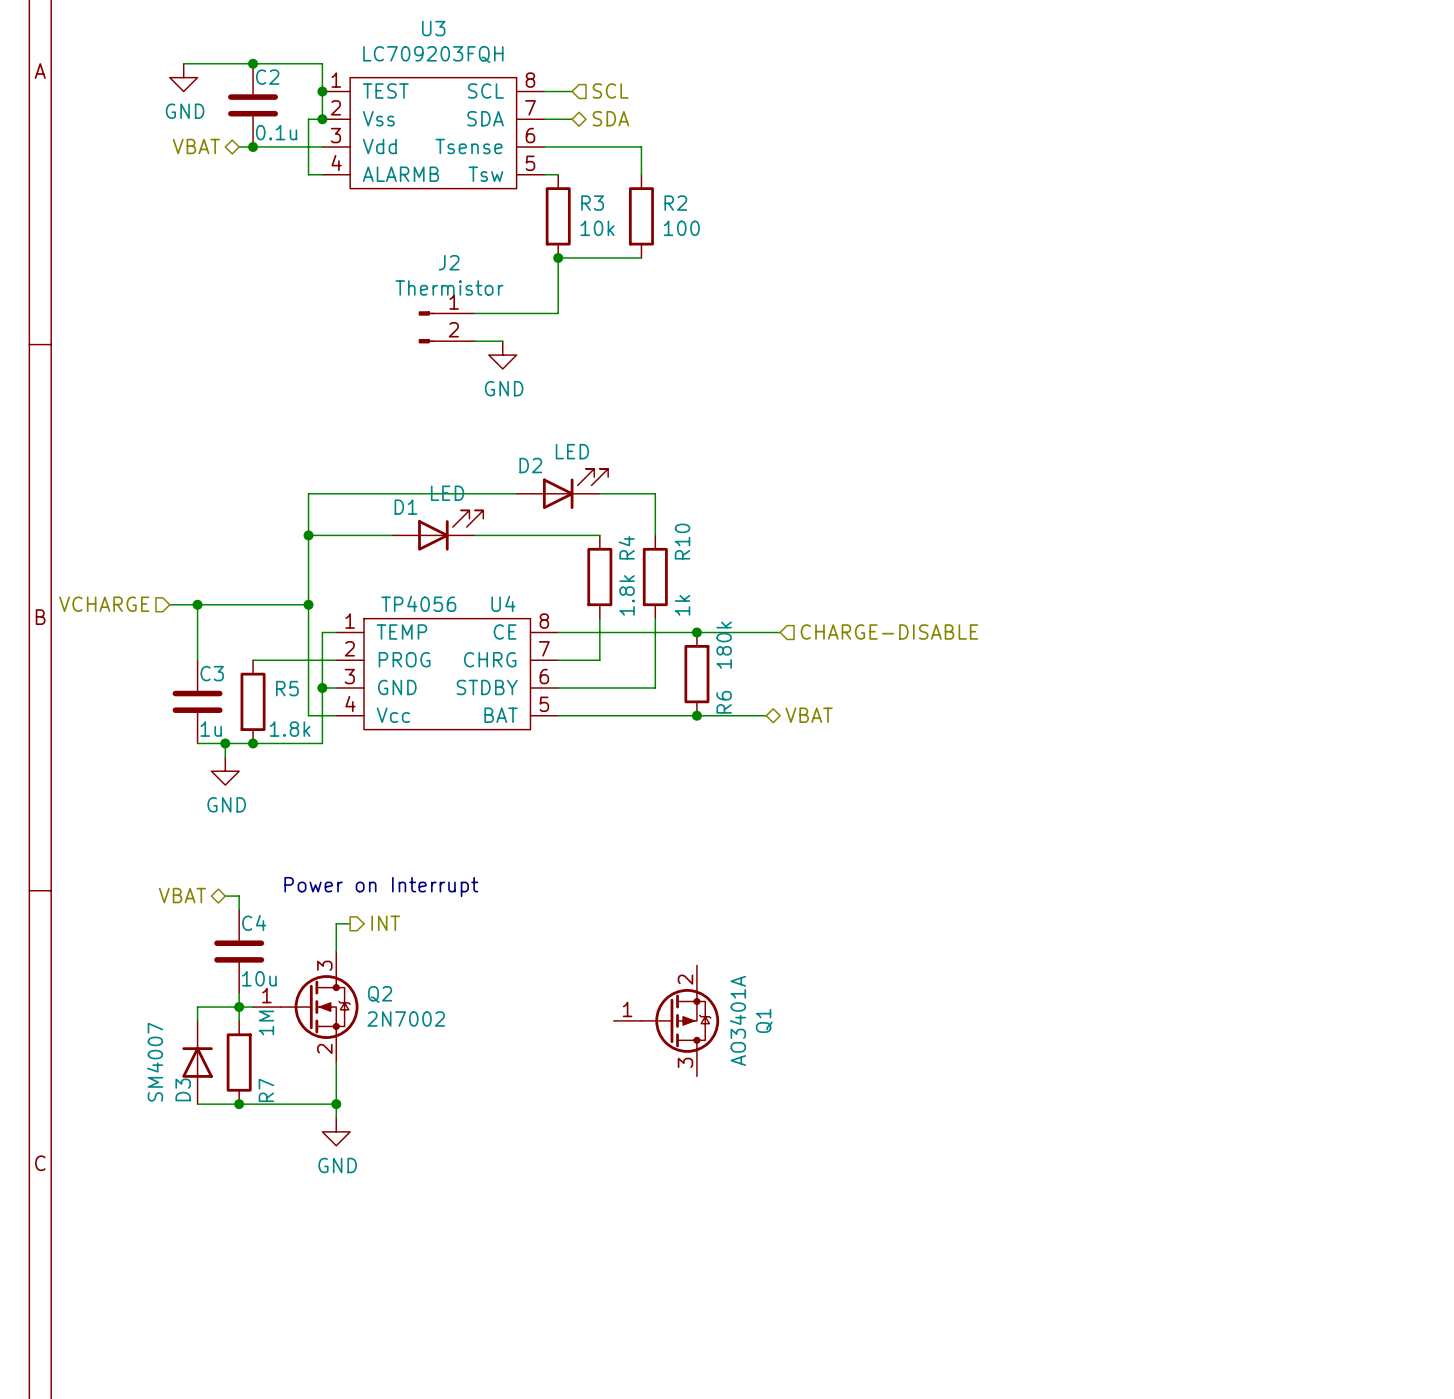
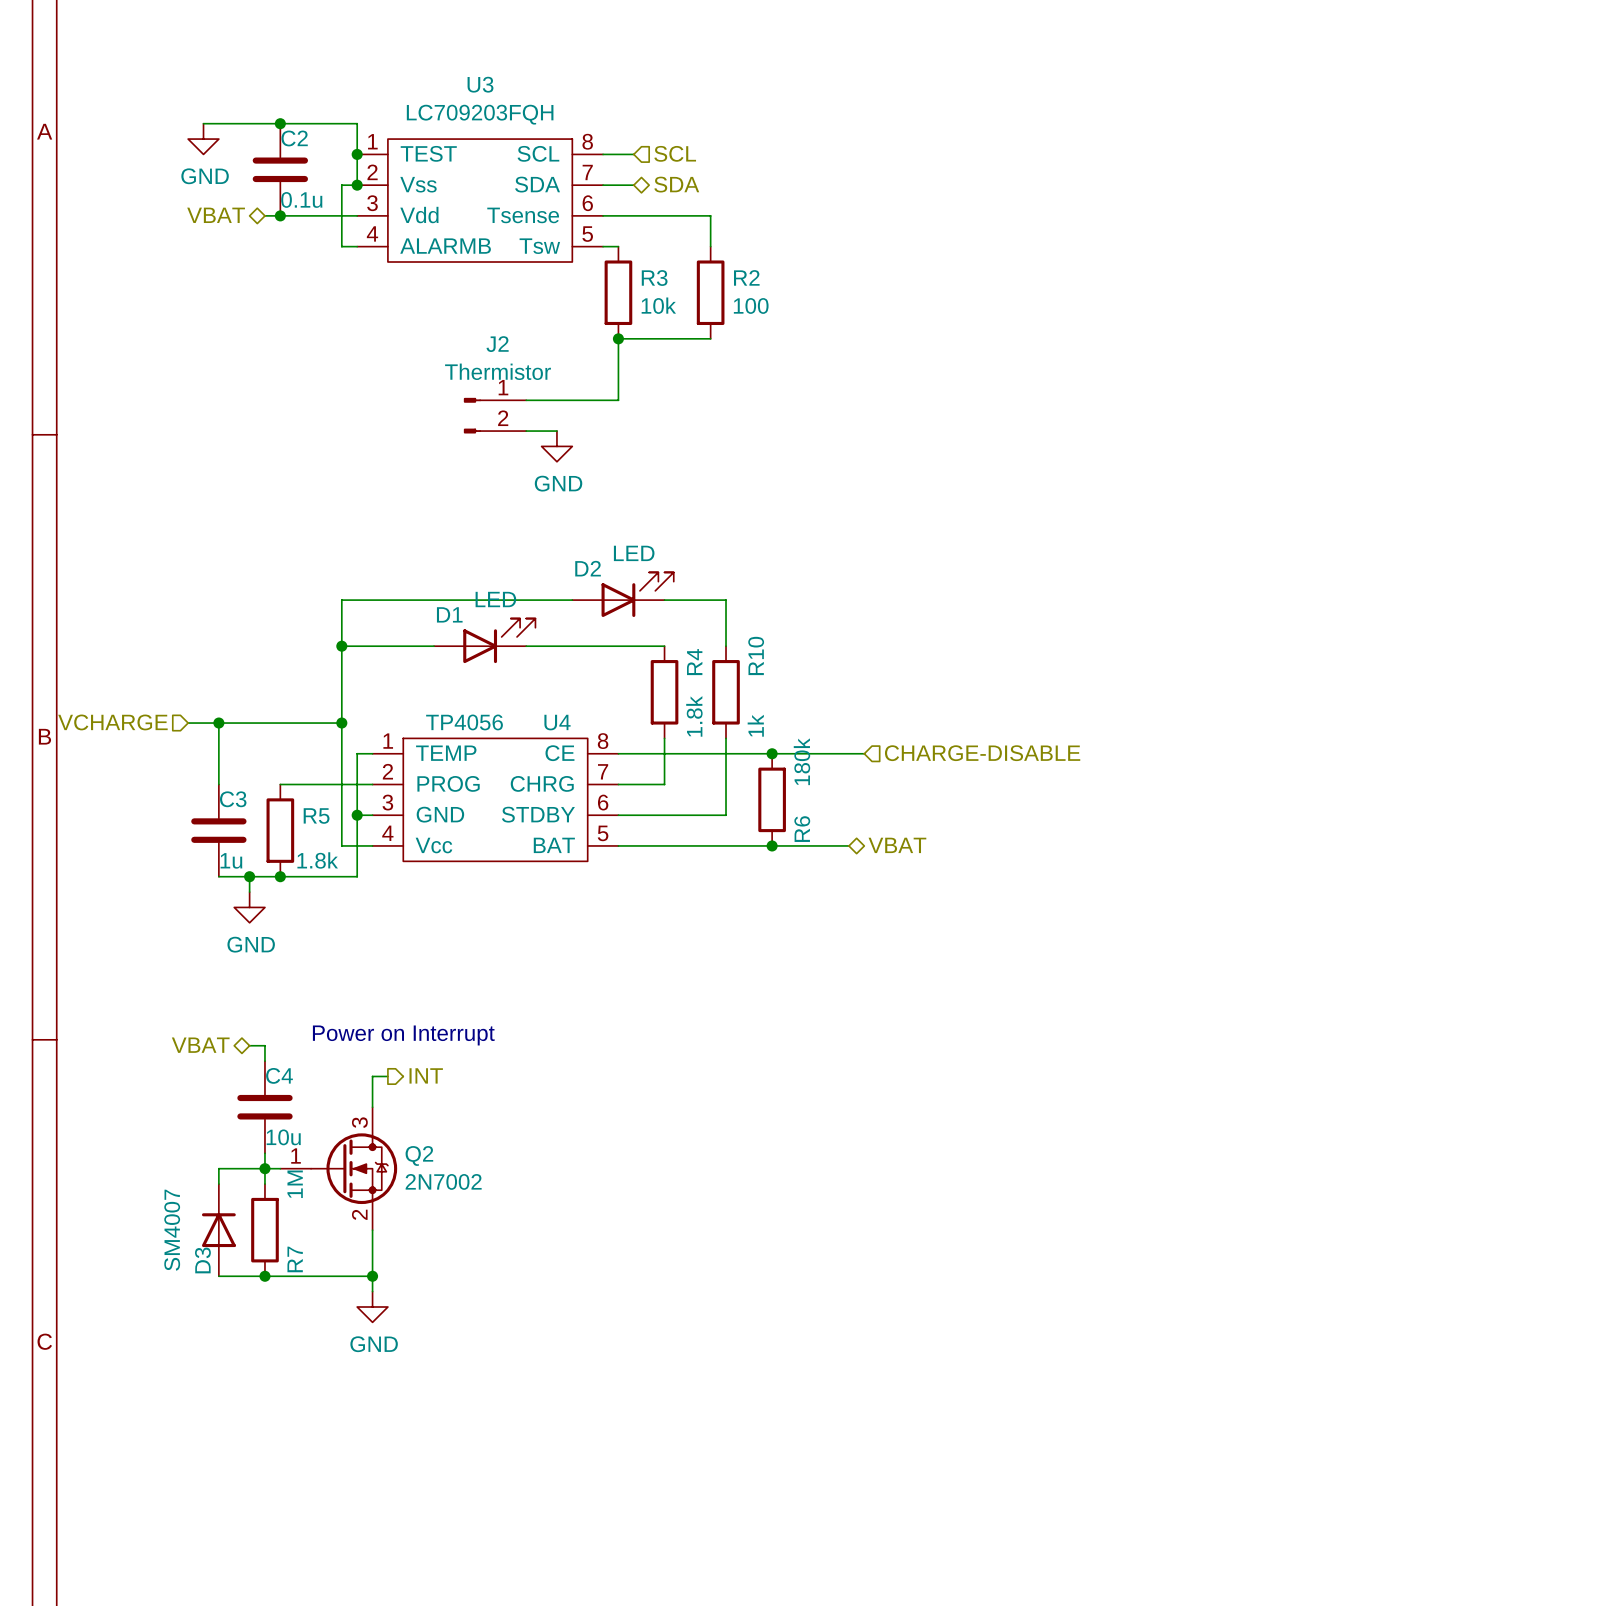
Q1: AO3401A (666, 1020) -> none

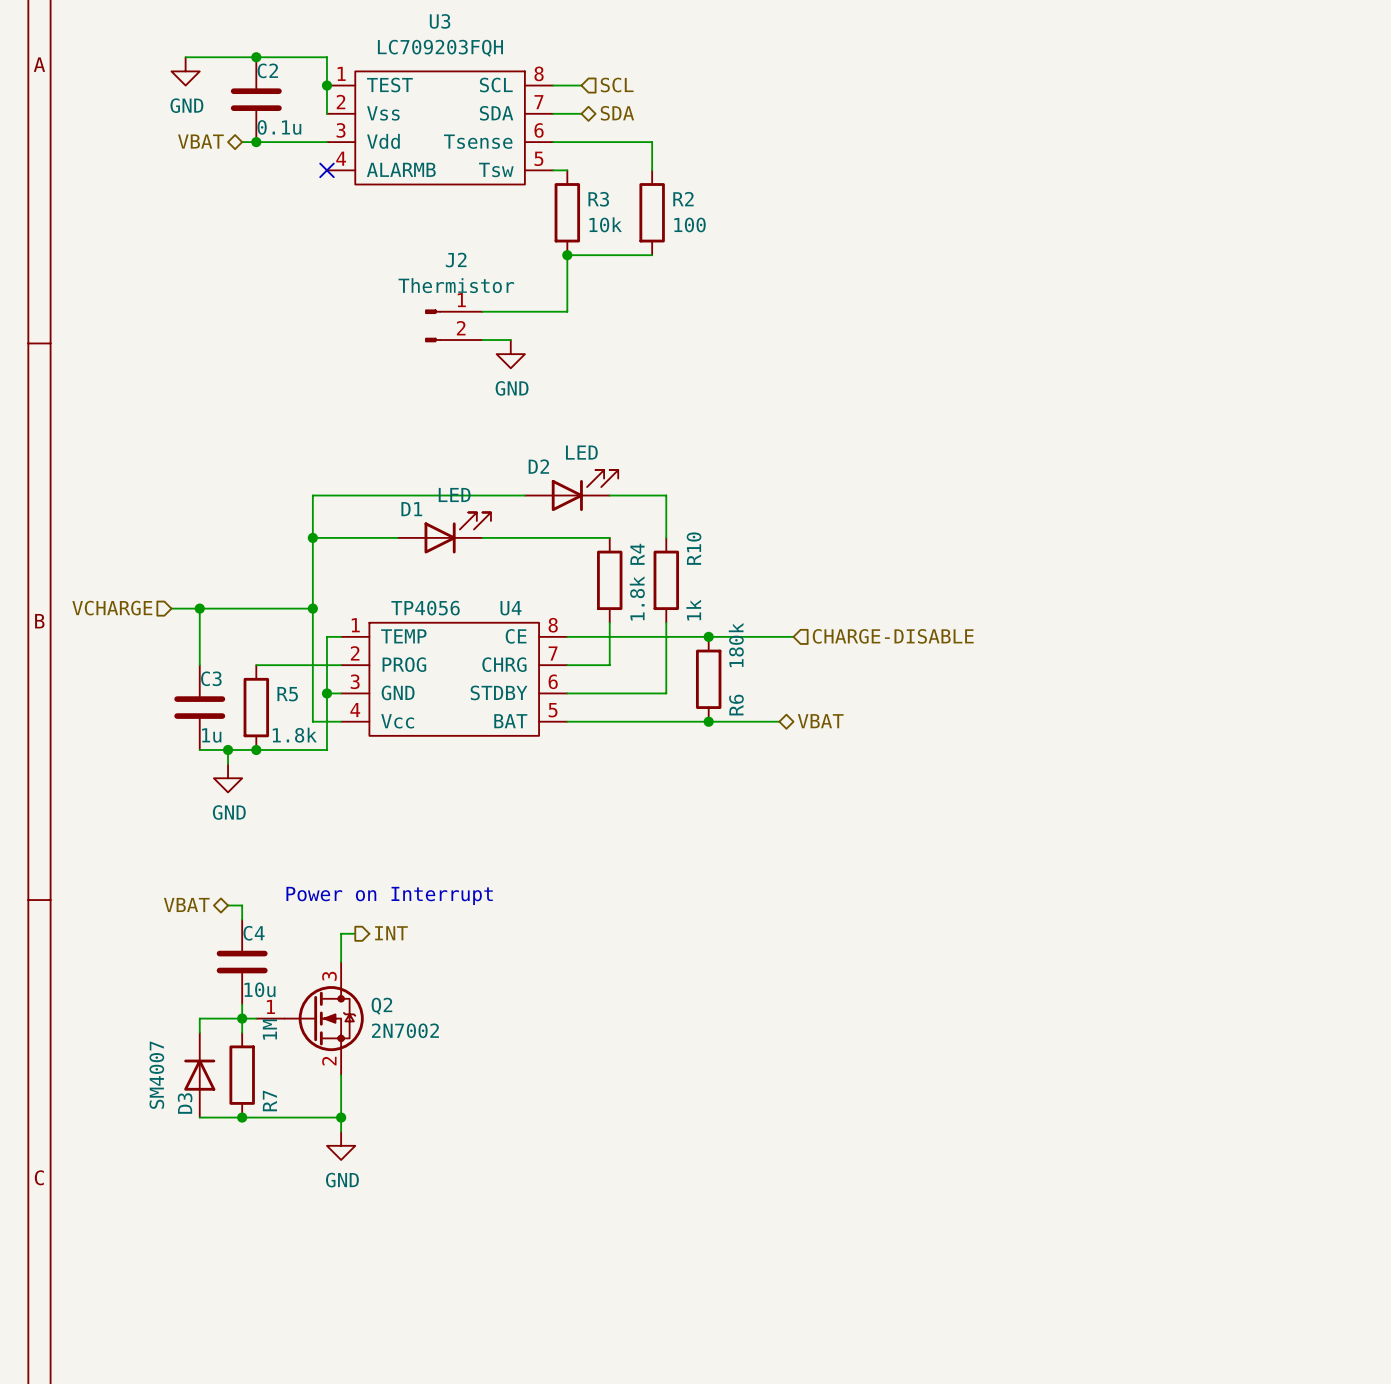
wire: (357, 185) (341, 185) (341, 246) (357, 246) -> none
junction: (357, 185) -> none
no-connect mark: none -> (326, 170)

